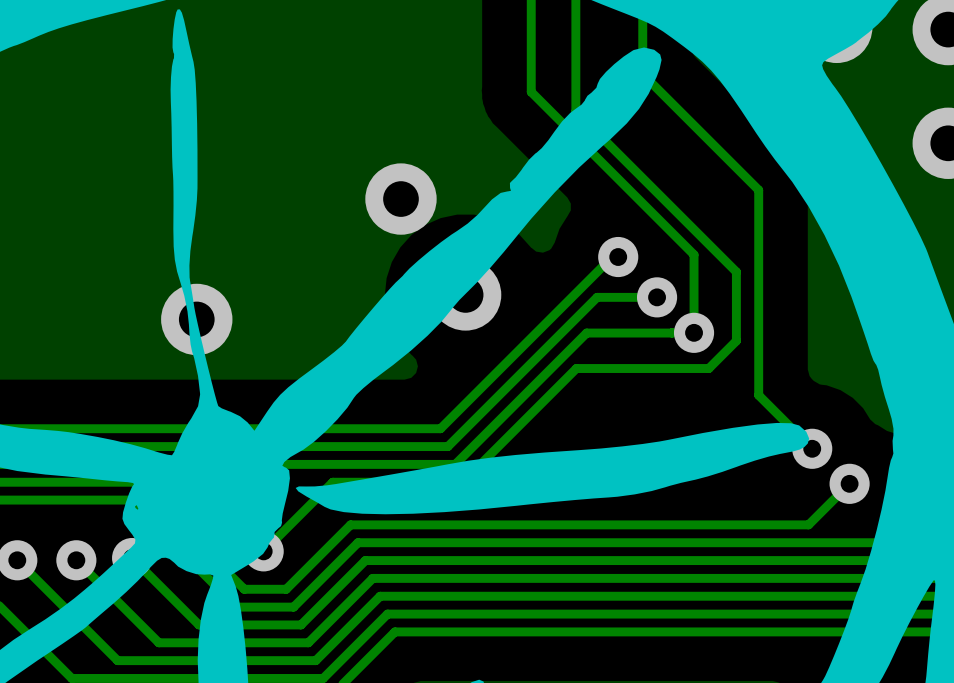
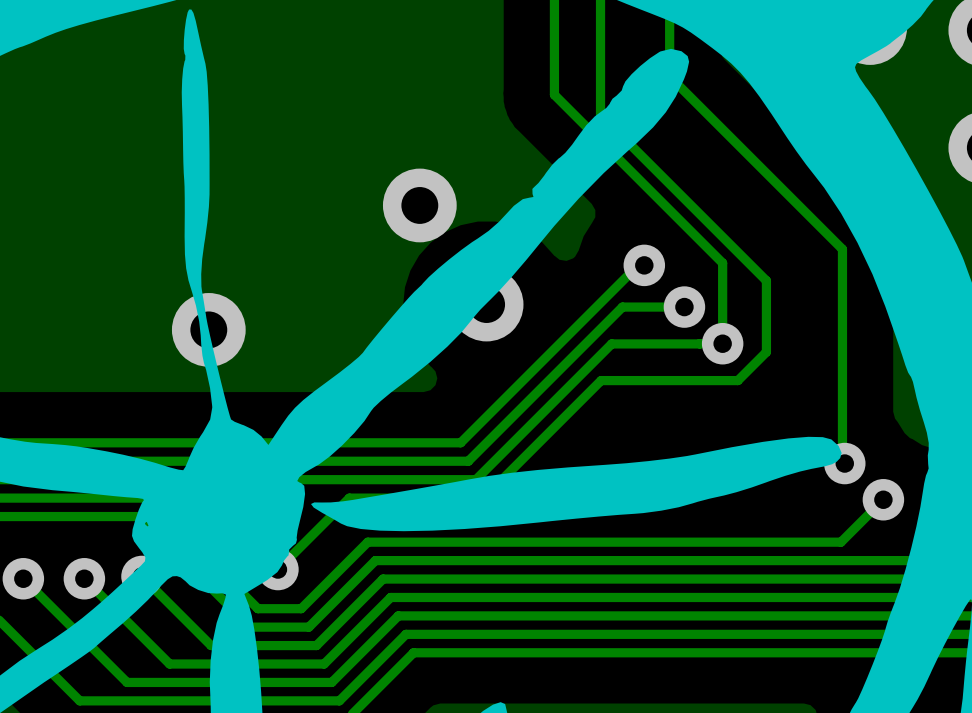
track: (758, 190) (758, 395) (809, 446) -> (789, 196) (842, 249) (842, 461)

